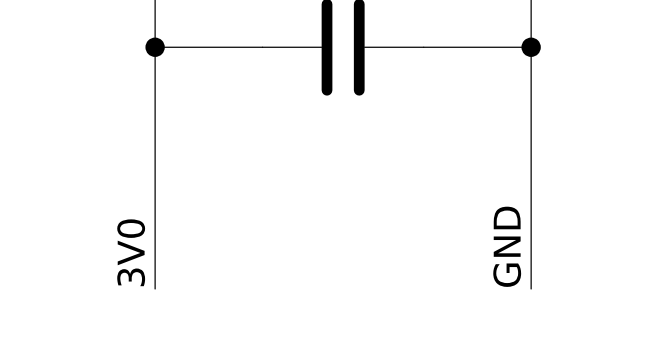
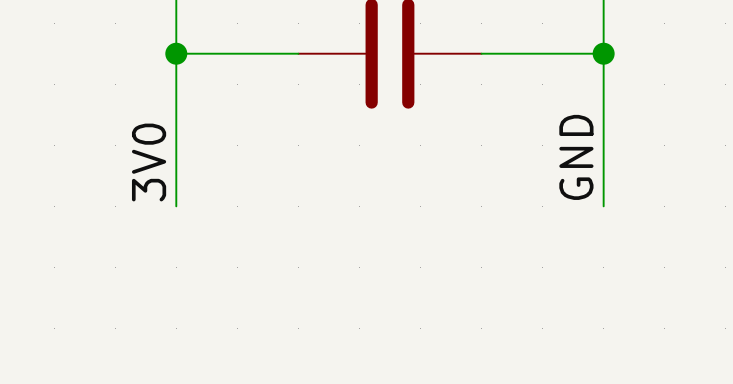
wire: (155, 181) (155, 288) -> none
wire: (531, 181) (531, 288) -> none
label position: GND (507, 246) -> GND (576, 157)
label position: 3V0 (131, 252) -> 3V0 (149, 162)

